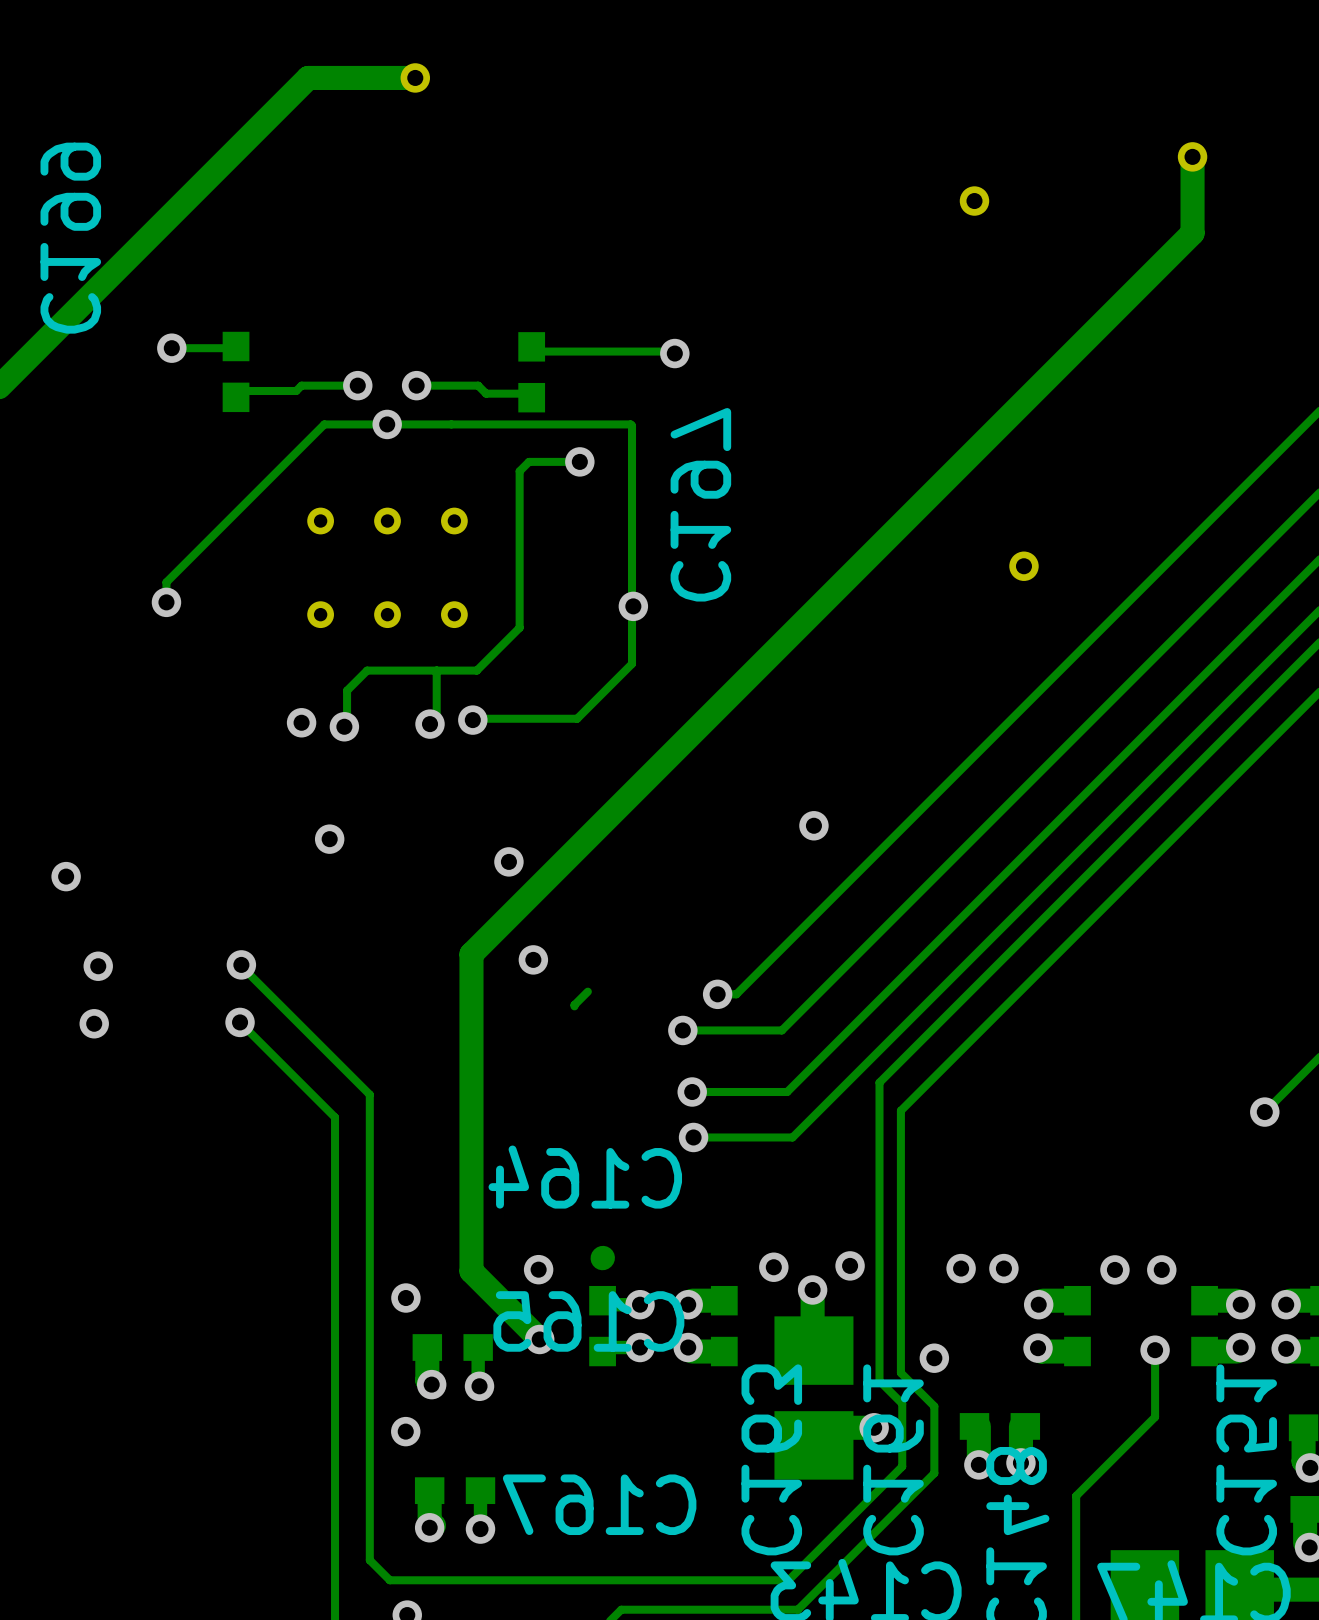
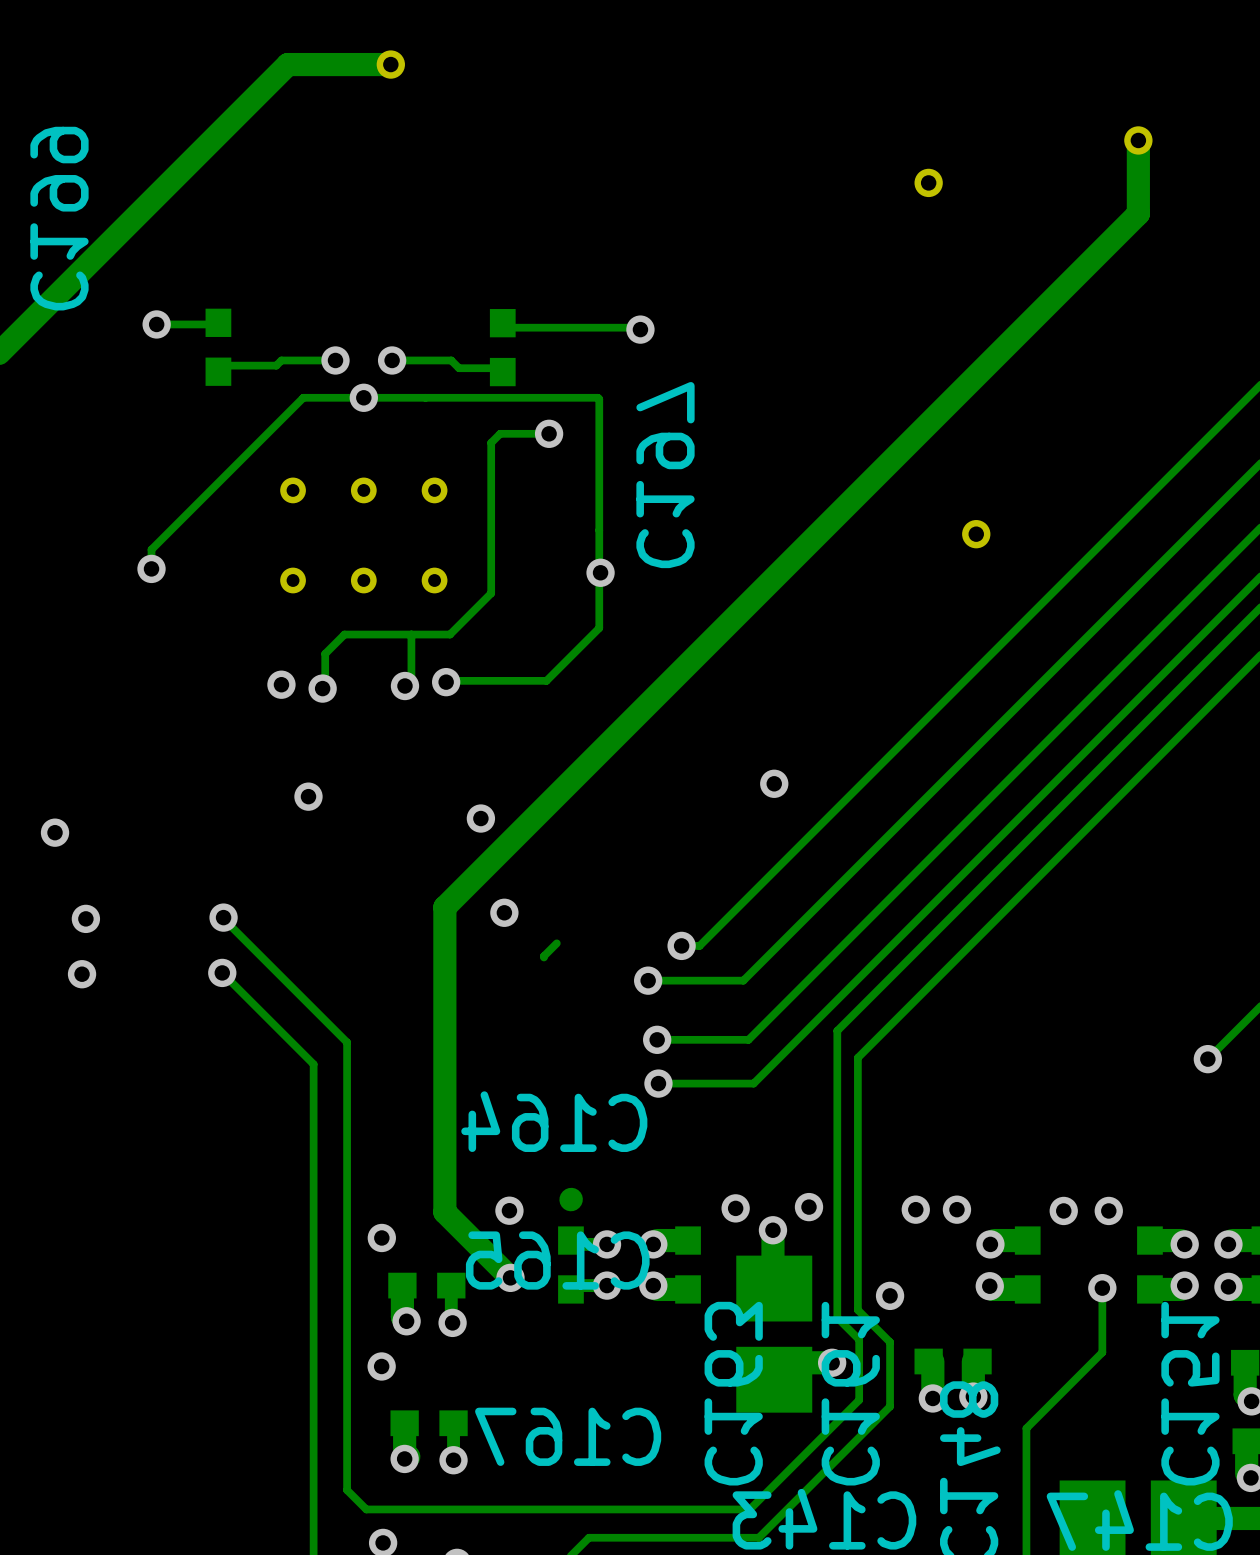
part footprint: [307, 507, 468, 629] -> [280, 477, 448, 594]

